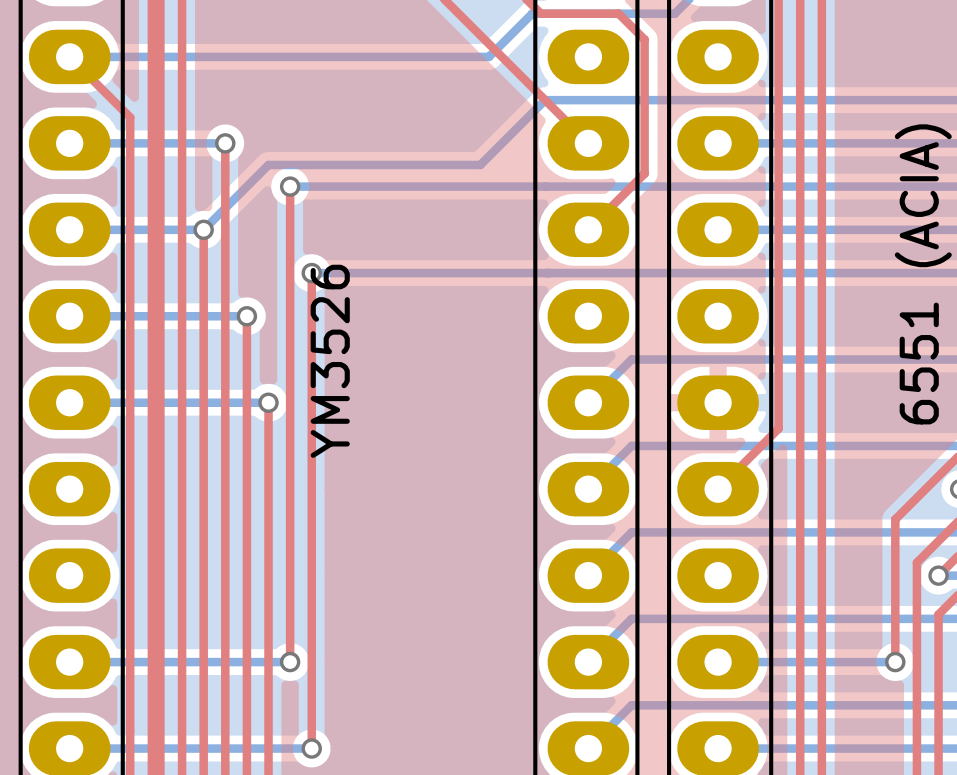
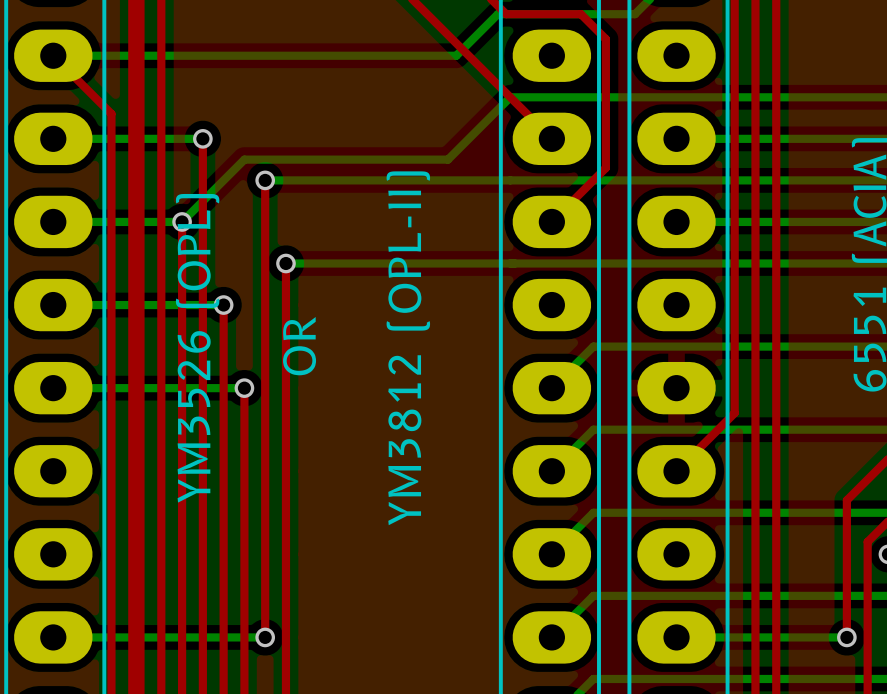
text: none -> OR (299, 346)
part value: YM3526 (330, 361) -> none
text: none -> YM3526 (OPL) (197, 348)
text: none -> YM3812 (OPL-II) (408, 348)

